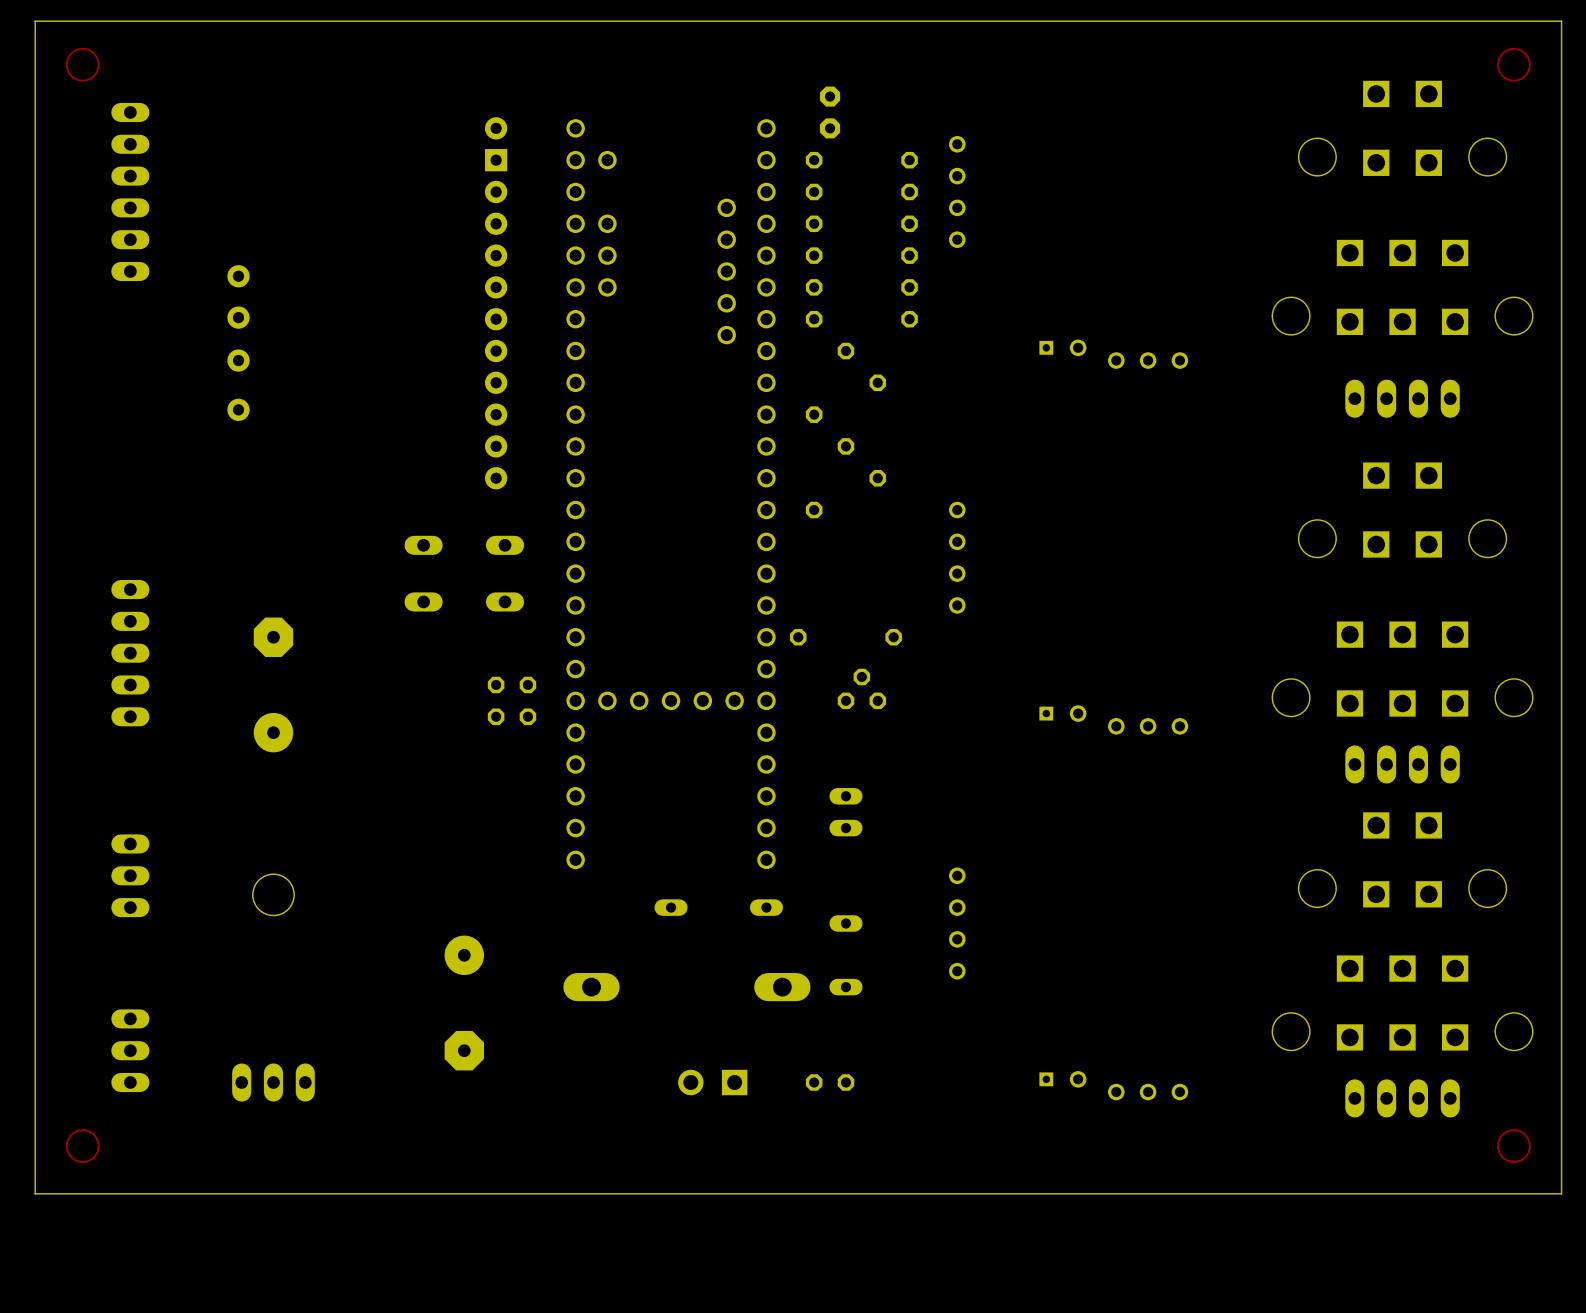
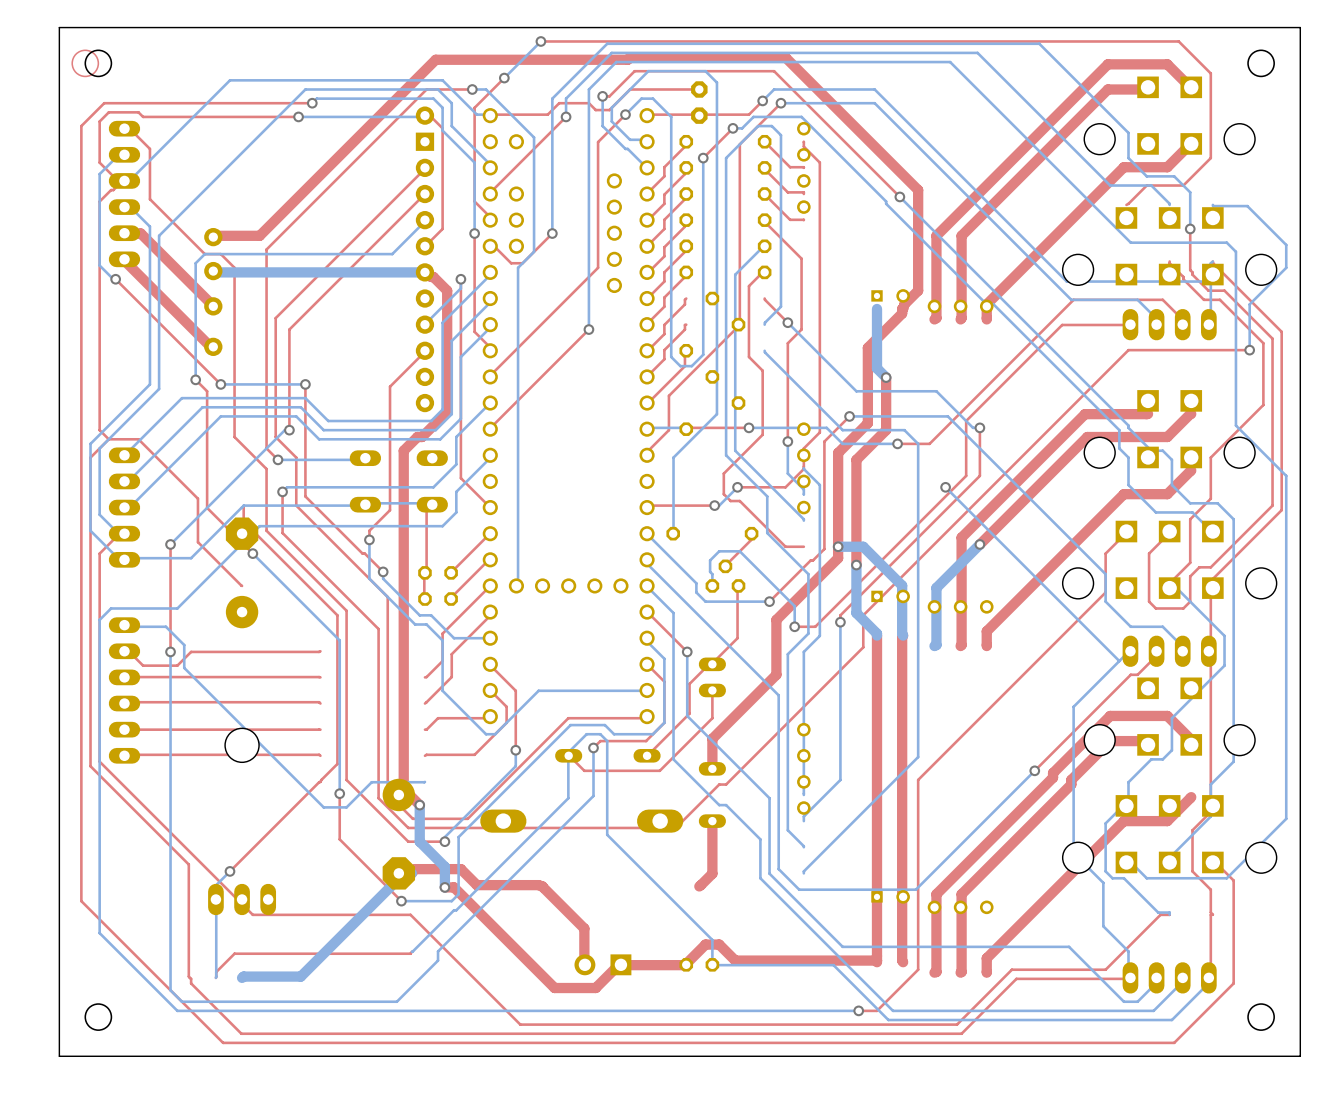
board edge: (51, 21) (35, 21) (35, 1193) (1561, 1193) -> (59, 27) (59, 1056) (1300, 1056) (1300, 990)
bottom track: none -> (540, 41) (504, 78)
top track: none -> (540, 41) (1178, 41) (1210, 73) (1210, 158) (1183, 185) (1146, 185) (1126, 204)
via: none -> (540, 41)
round board edge: none -> [84, 49, 113, 78]
drawing: [1497, 47, 1531, 82] -> none
round board edge: none -> [1247, 49, 1275, 78]
top track: none -> (504, 78) (474, 107) (474, 201) (488, 215) (488, 219) (490, 220)
via: none -> (504, 78)
top track: none -> (1148, 87) (1146, 89) (1107, 89) (961, 235) (960, 319)
top track: none -> (1191, 87) (1167, 64) (1107, 64) (936, 235) (936, 318) (934, 319)
bottom track: none -> (472, 89) (486, 89) (534, 137) (534, 251) (518, 267) (518, 585) (516, 585)
top track: none -> (472, 89) (426, 89) (266, 249) (266, 448) (277, 459)
via: none -> (472, 89)
top track: none -> (699, 89) (630, 89) (609, 110) (595, 110) (588, 103) (559, 103) (547, 114) (490, 115)
bottom track: none -> (602, 96) (602, 126) (647, 167)
top track: none -> (602, 96) (609, 96) (634, 71) (774, 71) (899, 196)
via: none -> (602, 96)
bottom track: none -> (762, 100) (774, 89) (874, 89) (1066, 281) (1210, 281)
top track: none -> (762, 100) (748, 114) (647, 115)
via: none -> (762, 100)
bottom track: none -> (312, 103) (316, 98) (433, 98) (442, 107) (442, 130) (474, 162) (474, 233)
top track: none -> (312, 103) (104, 103) (81, 126) (81, 901) (223, 1042) (1174, 1042) (1233, 983) (1233, 880) (1212, 858)
via: none -> (312, 103)
bottom track: none -> (780, 103) (874, 103) (1071, 299) (1137, 299) (1155, 318) (1156, 324)
top track: none -> (780, 103) (739, 144) (739, 324) (668, 395) (668, 430) (648, 450) (647, 455)
via: none -> (780, 103)
bottom track: none -> (625, 114) (641, 98) (652, 98) (671, 116) (671, 356) (680, 366) (691, 366) (703, 354) (703, 158)
top track: none -> (625, 114) (598, 142) (598, 267) (490, 376)
via: none -> (625, 114)
bottom track: none -> (424, 115) (298, 116)
top track: none -> (424, 115) (431, 116) (442, 128) (442, 228) (424, 246)
bottom track: none -> (490, 115) (476, 114) (442, 80) (229, 80) (129, 180) (124, 180)
top track: none -> (298, 116) (143, 116) (138, 112) (108, 112) (99, 121) (99, 162) (120, 183) (124, 180) (111, 190) (99, 201) (99, 430) (108, 439)
via: none -> (298, 116)
bottom track: none -> (566, 116) (566, 98) (611, 52) (977, 52) (1110, 185) (1151, 185) (1169, 204)
top track: none -> (566, 116) (490, 194)
via: none -> (566, 116)
bottom track: none -> (732, 128) (742, 128) (753, 116) (801, 116) (986, 304) (993, 304) (1119, 430) (1119, 448) (1128, 457) (1128, 485) (1155, 512) (1192, 512) (1212, 531)
top track: none -> (732, 128) (703, 158)
via: none -> (732, 128)
top track: none -> (124, 128) (124, 130) (131, 130) (149, 148) (149, 199) (204, 254) (220, 254) (234, 267) (234, 437) (266, 469) (266, 530) (346, 610) (346, 779) (408, 841) (444, 841)
bottom track: none -> (647, 141) (646, 139) (630, 139) (611, 121) (611, 107) (648, 71) (705, 71) (716, 82) (716, 414) (673, 457) (673, 533)
top track: none -> (686, 141) (684, 146) (664, 167) (664, 176) (647, 194)
top track: none -> (764, 141) (790, 167) (803, 167)
top track: none -> (803, 141) (803, 146) (819, 162) (819, 432) (803, 448) (803, 469) (785, 487) (737, 487)
top track: none -> (1191, 143) (1167, 167) (1123, 167) (986, 304) (986, 319)
bottom track: none -> (124, 154) (117, 155) (99, 174) (99, 265) (115, 279)
via: none -> (703, 158)
part position: (130, 191) -> (124, 194)
top track: none -> (424, 167) (275, 318) (275, 437) (296, 457) (296, 505) (387, 597) (387, 793) (412, 818) (467, 818) (568, 718) (646, 718) (647, 716)
bottom track: none -> (490, 167) (488, 167) (488, 162) (451, 126) (451, 103) (438, 89) (305, 89) (159, 235) (159, 389) (99, 448) (99, 514) (117, 533) (124, 533)
top track: none -> (686, 167) (684, 174) (664, 194) (664, 203) (647, 220)
top track: none -> (764, 167) (787, 192) (803, 192) (803, 194)
top track: none -> (424, 194) (289, 329) (289, 430)
top track: none -> (686, 194) (684, 199) (664, 219) (664, 228) (647, 246)
top track: none -> (764, 194) (790, 219) (803, 220)
bottom track: none -> (899, 196) (1151, 450) (1162, 450) (1171, 459) (1171, 485) (1190, 503) (1217, 503) (1233, 519) (1233, 761) (1210, 784) (1210, 816) (1169, 858)
via: none -> (899, 196)
bottom track: none -> (1212, 204) (1247, 206) (1286, 244) (1286, 267) (1249, 304) (1249, 350)
bottom track: none -> (124, 207) (131, 208) (149, 226) (149, 384) (90, 443) (90, 530) (117, 558) (124, 559) (124, 558) (191, 558) (243, 505) (364, 505) (367, 503) (432, 504)
bottom track: none -> (424, 220) (392, 254) (204, 254) (195, 263) (195, 379)
top track: none -> (686, 220) (684, 226) (664, 247) (664, 256) (647, 272)
top track: none -> (764, 220) (801, 258) (801, 329) (787, 343) (787, 441)
bottom track: none -> (1190, 228) (1190, 192) (1174, 176) (1146, 176) (1128, 158) (1128, 132) (1039, 43) (607, 43) (552, 98) (552, 233)
top track: none -> (1190, 228) (1190, 270) (1192, 274) (1208, 290) (1224, 290) (1272, 338) (1272, 505) (1210, 567) (1199, 567) (1190, 576) (1190, 601) (1183, 608) (1155, 608) (1149, 601) (1149, 553) (1169, 531)
via: none -> (1190, 228)
top track: none -> (124, 233) (140, 233) (213, 306)
top track: none -> (474, 233) (474, 331) (488, 345) (488, 350) (490, 350)
via: none -> (474, 233)
top track: none -> (552, 233) (522, 263) (511, 263) (495, 247) (490, 246)
via: none -> (552, 233)
top track: none -> (213, 237) (259, 235) (435, 59) (785, 57) (918, 190) (918, 290) (904, 304) (902, 313) (867, 347) (867, 423) (838, 453) (838, 558) (776, 619) (776, 674) (712, 738) (712, 768)
top track: none -> (686, 246) (684, 251) (664, 272) (664, 281) (647, 298)
bottom track: none -> (764, 246) (735, 274) (735, 450) (803, 520)
top track: none -> (124, 259) (211, 347) (213, 346)
top track: none -> (1169, 261) (1183, 279) (1203, 299) (1219, 299) (1263, 343) (1263, 405) (1210, 457) (1210, 498) (1190, 519) (1190, 562) (1169, 583) (1169, 588)
bottom track: none -> (1212, 261) (1210, 263) (1210, 322) (1208, 324)
top track: none -> (1212, 261) (1281, 331) (1281, 510) (1213, 578) (1213, 587) (1210, 590) (1210, 649) (1208, 651) (1210, 651) (1210, 811) (1192, 830) (1192, 871) (1210, 889) (1210, 912) (1212, 914) (1210, 914) (1210, 976) (1208, 977)
bottom track: none -> (213, 271) (424, 272)
top track: none -> (424, 272) (433, 276) (447, 290) (447, 411) (422, 437) (417, 437) (403, 450) (403, 789) (419, 805)
bottom track: none -> (490, 272) (488, 272) (488, 276) (442, 322) (442, 409) (431, 421) (328, 421) (305, 398) (181, 398) (124, 455)
top track: none -> (686, 272) (684, 276) (664, 297) (664, 306) (647, 324)
top track: none -> (764, 272) (748, 286) (748, 356) (762, 370) (762, 434) (723, 473) (723, 494) (730, 501) (739, 501) (785, 546) (803, 546)
top track: none -> (115, 279) (220, 384)
via: none -> (115, 279)
bottom track: none -> (460, 279) (460, 288) (424, 324)
top track: none -> (460, 279) (460, 478) (490, 507)
via: none -> (460, 279)
bottom track: none -> (490, 298) (488, 304) (451, 340) (451, 414) (435, 430) (323, 430) (300, 407) (202, 407) (129, 480) (124, 481)
top track: none -> (686, 298) (684, 304) (664, 324) (664, 334) (647, 350)
top track: none -> (764, 298) (787, 322)
bottom track: none -> (877, 308) (877, 368) (886, 377)
bottom track: none -> (787, 322) (856, 391) (936, 391) (973, 427) (979, 427)
via: none -> (787, 322)
bottom track: none -> (490, 324) (488, 324) (488, 329) (460, 356) (460, 418) (440, 439) (319, 439) (296, 416) (220, 416) (131, 505) (124, 505) (124, 507)
top track: none -> (686, 324) (684, 329) (664, 350) (664, 359) (647, 376)
bottom track: none -> (764, 324) (780, 306) (780, 135) (771, 126) (758, 126) (726, 158) (726, 455) (767, 496) (767, 533) (808, 574) (808, 633) (787, 654) (787, 830) (803, 847)
top track: none -> (1130, 324) (1062, 324) (966, 421) (966, 475) (815, 626) (794, 626)
top track: none -> (1182, 324) (1181, 318) (1162, 299) (1073, 299) (929, 443) (897, 443)
bottom track: none -> (588, 329) (588, 89) (616, 62) (950, 62) (1130, 242) (1226, 242) (1235, 251) (1235, 425) (1286, 475) (1286, 818) (1226, 878) (1146, 878) (1126, 858)
top track: none -> (588, 329) (490, 429)
via: none -> (588, 329)
part position: (1402, 398) -> (1169, 324)
top track: none -> (1249, 350) (1128, 350) (863, 615) (863, 647) (726, 784) (719, 784) (675, 827) (408, 827) (378, 798) (378, 629) (282, 533) (282, 491)
via: none -> (1249, 350)
top track: none -> (424, 350) (390, 386) (390, 510) (369, 530) (369, 539)
top track: none -> (686, 350) (684, 366) (647, 403)
bottom track: none -> (764, 350) (842, 430) (904, 430) (918, 443) (918, 757) (803, 873)
top track: none -> (886, 377) (886, 430) (856, 459) (856, 565)
via: none -> (886, 377)
top track: none -> (195, 379) (207, 391) (207, 507) (252, 553)
via: none -> (195, 379)
via: none -> (220, 384)
bottom track: none -> (305, 384) (220, 384)
top track: none -> (305, 384) (305, 496) (383, 571)
via: none -> (305, 384)
bottom track: none -> (490, 403) (456, 437) (456, 464) (433, 487) (287, 487) (282, 491)
top track: none -> (1148, 413) (1085, 414) (961, 537) (960, 646)
top track: none -> (1191, 413) (1167, 437) (1087, 437) (979, 544)
bottom track: none -> (849, 416) (947, 416) (1105, 574) (1105, 601) (1130, 626) (1162, 626) (1181, 645) (1182, 651)
top track: none -> (849, 416) (824, 441) (824, 549) (769, 601)
via: none -> (849, 416)
bottom track: none -> (682, 427) (647, 429)
bottom track: none -> (748, 427) (826, 427) (842, 443) (897, 443)
top track: none -> (748, 427) (682, 427)
via: none -> (748, 427)
top track: none -> (979, 427) (979, 475) (840, 615) (840, 622)
via: none -> (979, 427)
bottom track: none -> (289, 430) (284, 430) (170, 544)
via: none -> (289, 430)
top track: none -> (108, 439) (90, 457) (90, 766) (188, 864) (188, 976) (191, 983) (241, 1033) (961, 1033) (1016, 978) (1130, 977)
top track: none -> (108, 439) (138, 439) (197, 498) (197, 542) (242, 585)
bottom track: none -> (787, 441) (787, 473) (803, 489) (803, 494)
via: none -> (787, 441)
via: none -> (897, 443)
bottom track: none -> (490, 455) (488, 455) (488, 459) (456, 491) (456, 512) (442, 526) (259, 526) (177, 608) (111, 608) (99, 619) (99, 933) (177, 1010) (858, 1010)
bottom track: none -> (365, 458) (364, 459) (277, 459)
via: none -> (277, 459)
bottom track: none -> (803, 468) (819, 485) (819, 635) (803, 651) (803, 794)
top track: none -> (1191, 470) (1167, 494) (1123, 494) (986, 631) (986, 646)
bottom track: none -> (737, 487) (719, 505) (714, 505)
via: none -> (737, 487)
bottom track: none -> (945, 487) (1119, 661)
via: none -> (945, 487)
via: none -> (282, 491)
top track: none -> (432, 504) (426, 510) (424, 599)
top track: none -> (714, 505) (648, 505) (647, 507)
via: none -> (714, 505)
top track: none -> (242, 507) (243, 507) (243, 521) (337, 615) (337, 763) (229, 871)
top track: none -> (1126, 531) (1105, 553) (1105, 592) (918, 779) (918, 969) (877, 1010) (858, 1010)
top track: none -> (124, 533) (117, 535) (99, 553) (99, 761) (252, 914) (410, 914) (520, 1024) (957, 1024) (1011, 969) (1105, 969) (1160, 914) (1169, 914)
top track: none -> (490, 533) (451, 572)
bottom track: none -> (647, 533) (696, 583) (696, 592) (705, 601) (769, 601)
top track: none -> (751, 533) (751, 539) (725, 566)
bottom track: none -> (369, 539) (369, 578) (415, 624) (426, 624) (442, 640) (442, 690) (486, 734) (495, 734) (538, 690) (647, 690)
via: none -> (369, 539)
top track: none -> (170, 544) (170, 651)
via: none -> (170, 544)
bottom track: none -> (979, 544) (936, 587) (936, 645) (934, 646)
via: none -> (979, 544)
part position: (130, 653) -> (124, 507)
bottom track: none -> (838, 546) (863, 546) (902, 585) (903, 635)
via: none -> (838, 546)
bottom track: none -> (252, 553) (339, 640) (339, 793)
via: none -> (252, 553)
top track: none -> (490, 559) (451, 599)
bottom track: none -> (647, 559) (648, 565) (778, 695) (778, 869) (799, 889) (915, 889) (1034, 770)
bottom track: none -> (856, 565) (856, 613) (877, 635)
via: none -> (856, 565)
bottom track: none -> (383, 571) (383, 578) (419, 615) (431, 615) (454, 638) (490, 638)
via: none -> (383, 571)
top track: none -> (490, 585) (442, 633) (442, 661) (424, 677)
bottom track: none -> (647, 585) (673, 613) (673, 759) (719, 805) (726, 805) (760, 839) (760, 878) (893, 1010) (1153, 1010) (1181, 983) (1182, 977)
bottom track: none -> (712, 585) (710, 560) (719, 551) (739, 551) (794, 606) (794, 626)
top track: none -> (738, 585) (737, 638) (712, 663) (712, 665) (707, 665) (689, 683) (689, 713) (647, 755)
bottom track: none -> (1169, 588) (1169, 590) (1178, 590) (1224, 635) (1224, 665) (1171, 718) (1171, 750) (1162, 759) (1151, 759) (1128, 782) (1128, 800) (1105, 823) (1105, 871) (1112, 878) (1123, 878) (1158, 912) (1169, 912) (1169, 914)
via: none -> (769, 601)
top track: none -> (490, 612) (488, 613) (488, 617) (451, 654) (451, 677) (424, 703)
top track: none -> (647, 612) (687, 651)
bottom track: none -> (840, 622) (840, 779) (803, 816) (803, 821)
via: none -> (840, 622)
bottom track: none -> (124, 625) (124, 626) (165, 626) (184, 645) (184, 667) (323, 807) (346, 807) (371, 782) (424, 781)
via: none -> (794, 626)
top track: none -> (877, 635) (877, 962)
top track: none -> (903, 635) (903, 962)
bottom track: none -> (647, 638) (648, 642) (664, 658) (664, 722) (652, 734) (614, 734) (604, 725) (570, 725) (458, 837) (458, 894) (451, 901) (401, 901)
part position: (1402, 764) -> (1169, 651)
top track: none -> (320, 651) (191, 651) (177, 665) (143, 665) (129, 651) (124, 651)
bottom track: none -> (1130, 651) (1073, 706) (1073, 853) (1103, 882) (1103, 926) (1128, 951) (1128, 976) (1130, 977)
top track: none -> (1156, 651) (1155, 656) (1137, 674) (1130, 674) (1034, 770)
bottom track: none -> (170, 651) (170, 990) (181, 1001) (396, 1001) (438, 960) (438, 951) (593, 795) (593, 747)
via: none -> (170, 651)
bottom track: none -> (687, 651) (687, 715) (769, 798) (769, 873) (842, 946) (1069, 946) (1123, 1001) (1137, 1001) (1155, 983) (1156, 977)
via: none -> (687, 651)
top track: none -> (490, 664) (515, 690) (515, 750)
top track: none -> (647, 664) (664, 681) (664, 722) (646, 741) (600, 741) (593, 747)
top track: none -> (320, 677) (124, 677)
part: none -> (124, 690)
top track: none -> (490, 690) (506, 706) (506, 722) (474, 754) (424, 755)
top track: none -> (712, 690) (712, 718) (659, 770) (584, 770) (568, 755)
top track: none -> (320, 703) (124, 703)
top track: none -> (490, 716) (488, 718) (438, 718) (424, 729)
part: (130, 875) -> none
top track: none -> (320, 729) (124, 729)
top track: none -> (1148, 740) (1110, 741) (1071, 779) (1071, 784) (961, 894) (960, 972)
top track: none -> (1191, 740) (1167, 715) (1110, 715) (1053, 773) (1053, 777) (936, 894) (936, 972) (934, 972)
via: none -> (593, 747)
bottom track: none -> (515, 750) (515, 766) (444, 837) (444, 841)
via: none -> (515, 750)
top track: none -> (320, 755) (124, 755)
via: none -> (1034, 770)
top track: none -> (339, 793) (339, 839) (401, 901)
via: none -> (339, 793)
top track: none -> (1191, 797) (1167, 821) (1123, 821) (986, 958) (986, 972)
bottom track: none -> (419, 805) (419, 841) (444, 866) (444, 887)
via: none -> (419, 805)
top track: none -> (712, 821) (712, 873) (699, 886)
via: none -> (444, 841)
bottom track: none -> (229, 871) (216, 885) (215, 977)
via: none -> (229, 871)
part: (130, 1050) -> none
bottom track: none -> (411, 873) (403, 873) (300, 976) (242, 977)
top track: none -> (411, 873) (415, 869) (460, 869) (476, 885) (542, 886) (584, 928) (584, 964)
top track: none -> (444, 887) (454, 887) (554, 988) (595, 988) (620, 964) (686, 964) (705, 944) (719, 944) (735, 960) (877, 960)
via: none -> (444, 887)
part position: (712, 1082) -> (602, 964)
part position: (830, 1082) -> (699, 964)
via: none -> (401, 901)
part position: (1402, 1098) -> (1169, 977)
drawing: [65, 1129, 100, 1163] -> none
drawing: [1497, 1129, 1531, 1163] -> none
bottom track: none -> (411, 951) (454, 910) (456, 910) (568, 798) (568, 757) (570, 750) (586, 734) (600, 734) (607, 741) (607, 834) (712, 940) (712, 965) (833, 965) (888, 1020) (1171, 1020) (1208, 983) (1208, 977)
top track: none -> (411, 951) (410, 953) (234, 953) (216, 972) (215, 977)
round board edge: none -> [84, 1003, 113, 1031]
round board edge: none -> [1247, 1003, 1275, 1031]
via: none -> (858, 1010)

